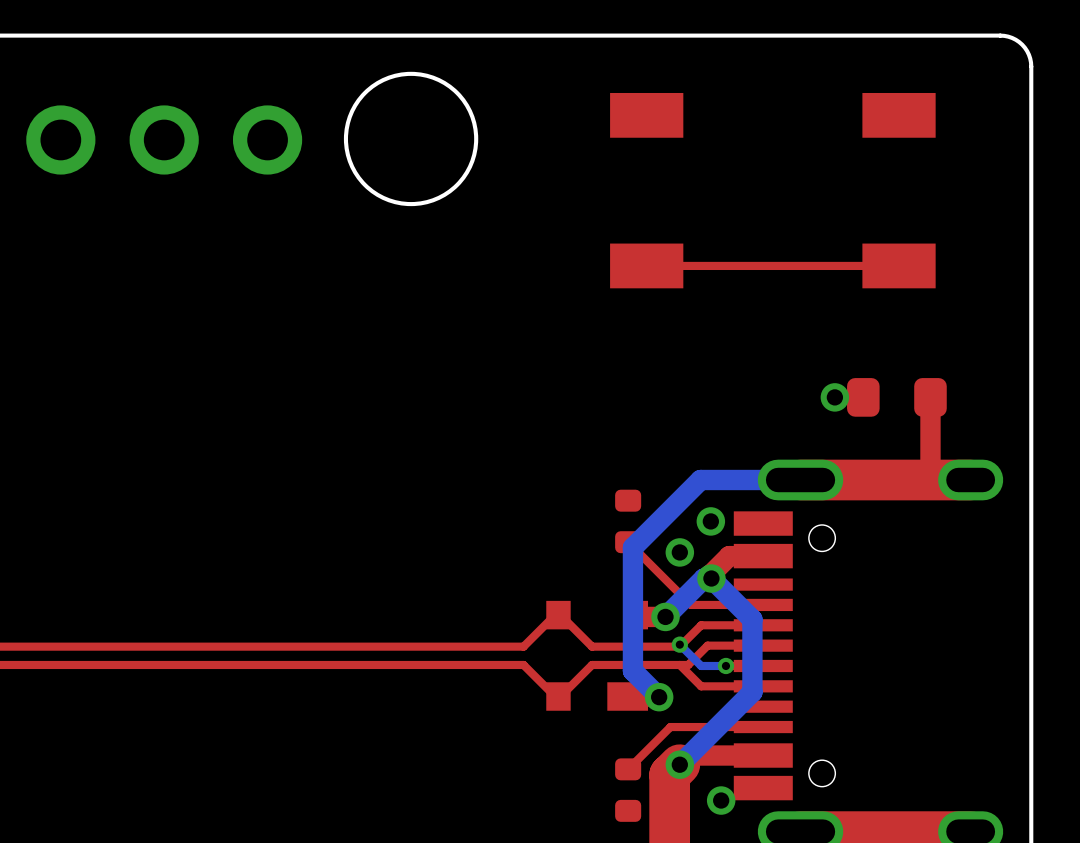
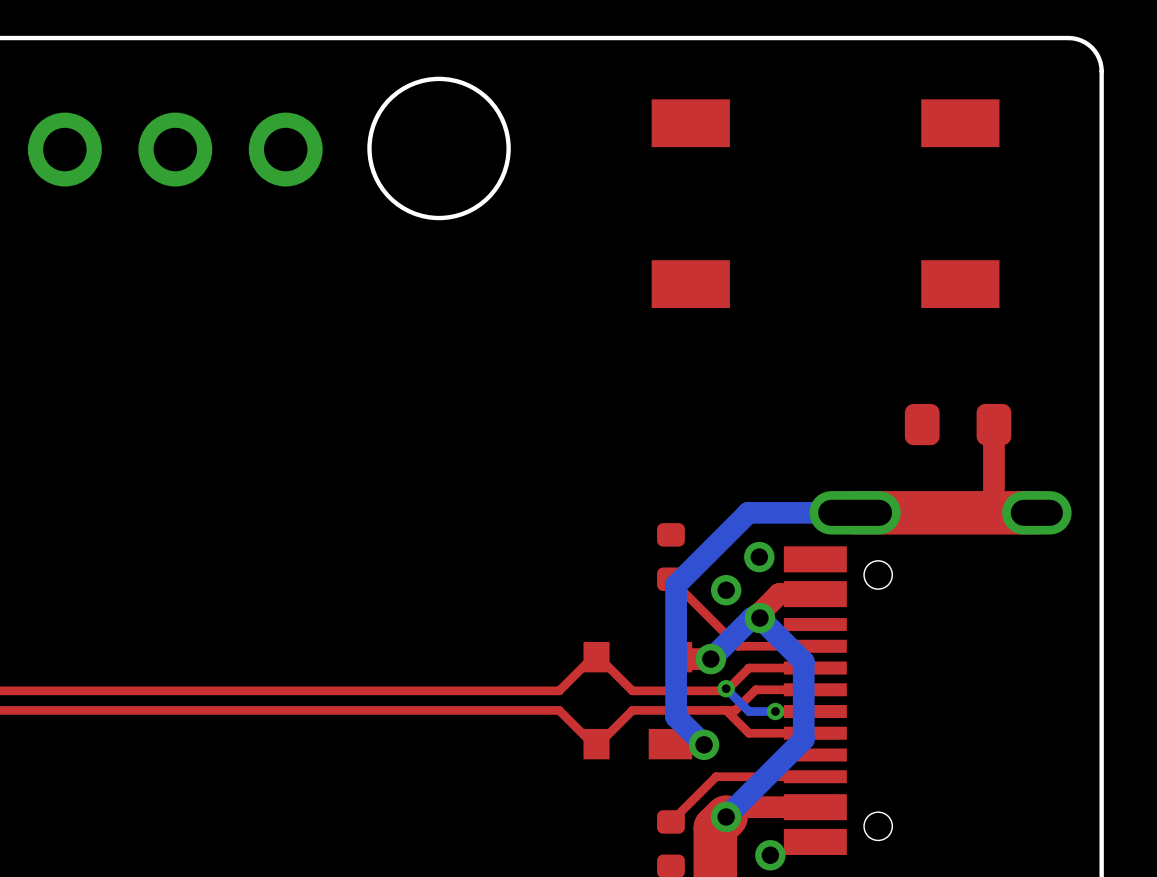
top track: (899, 265) (646, 265) -> none
via: (834, 397) -> none

